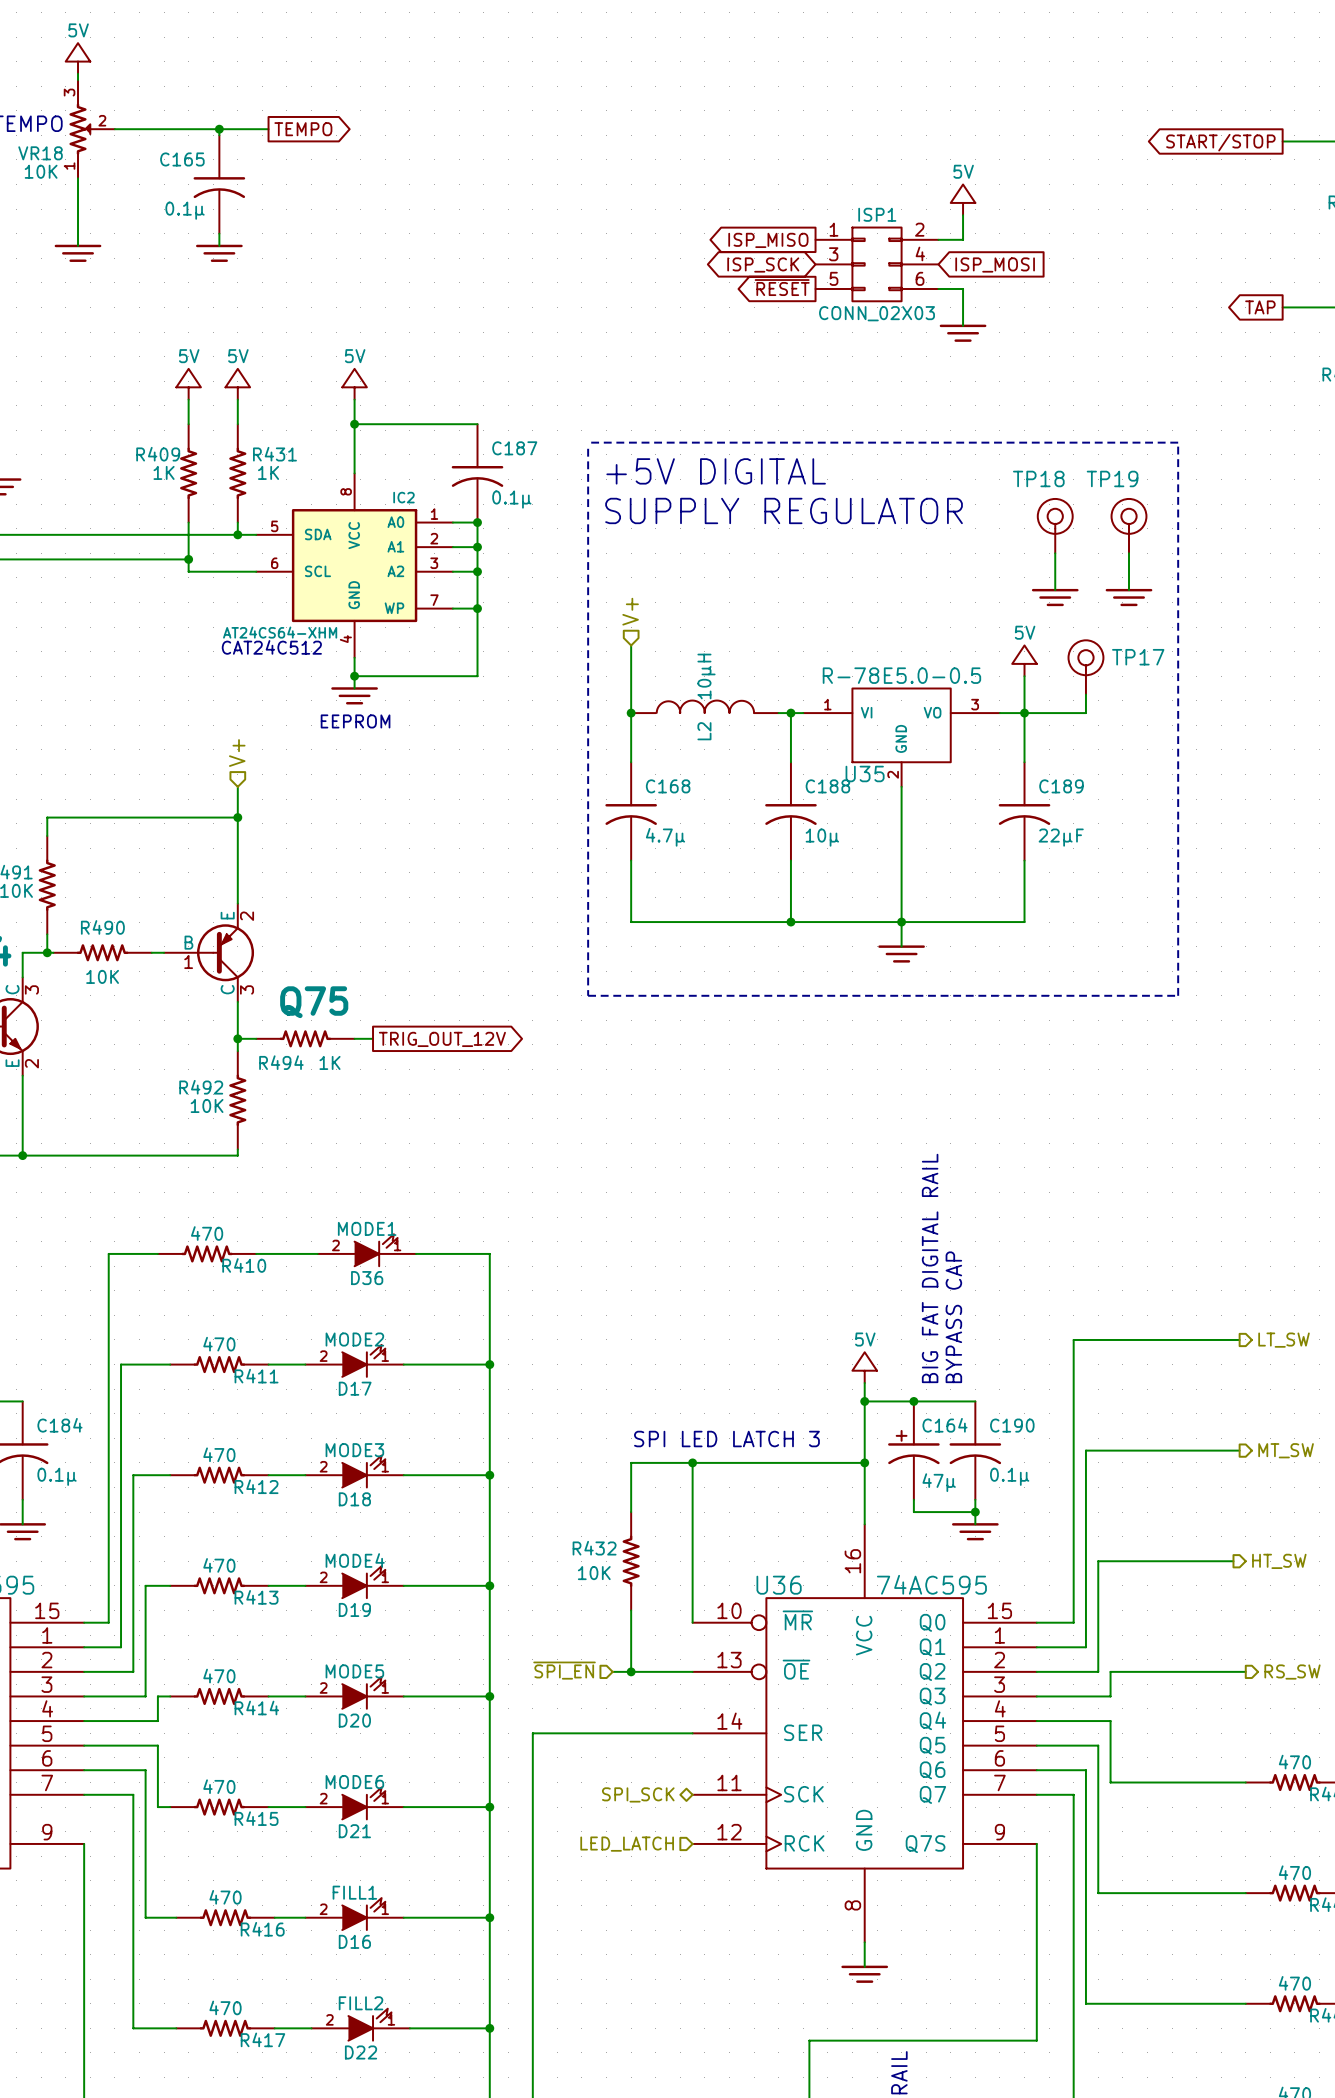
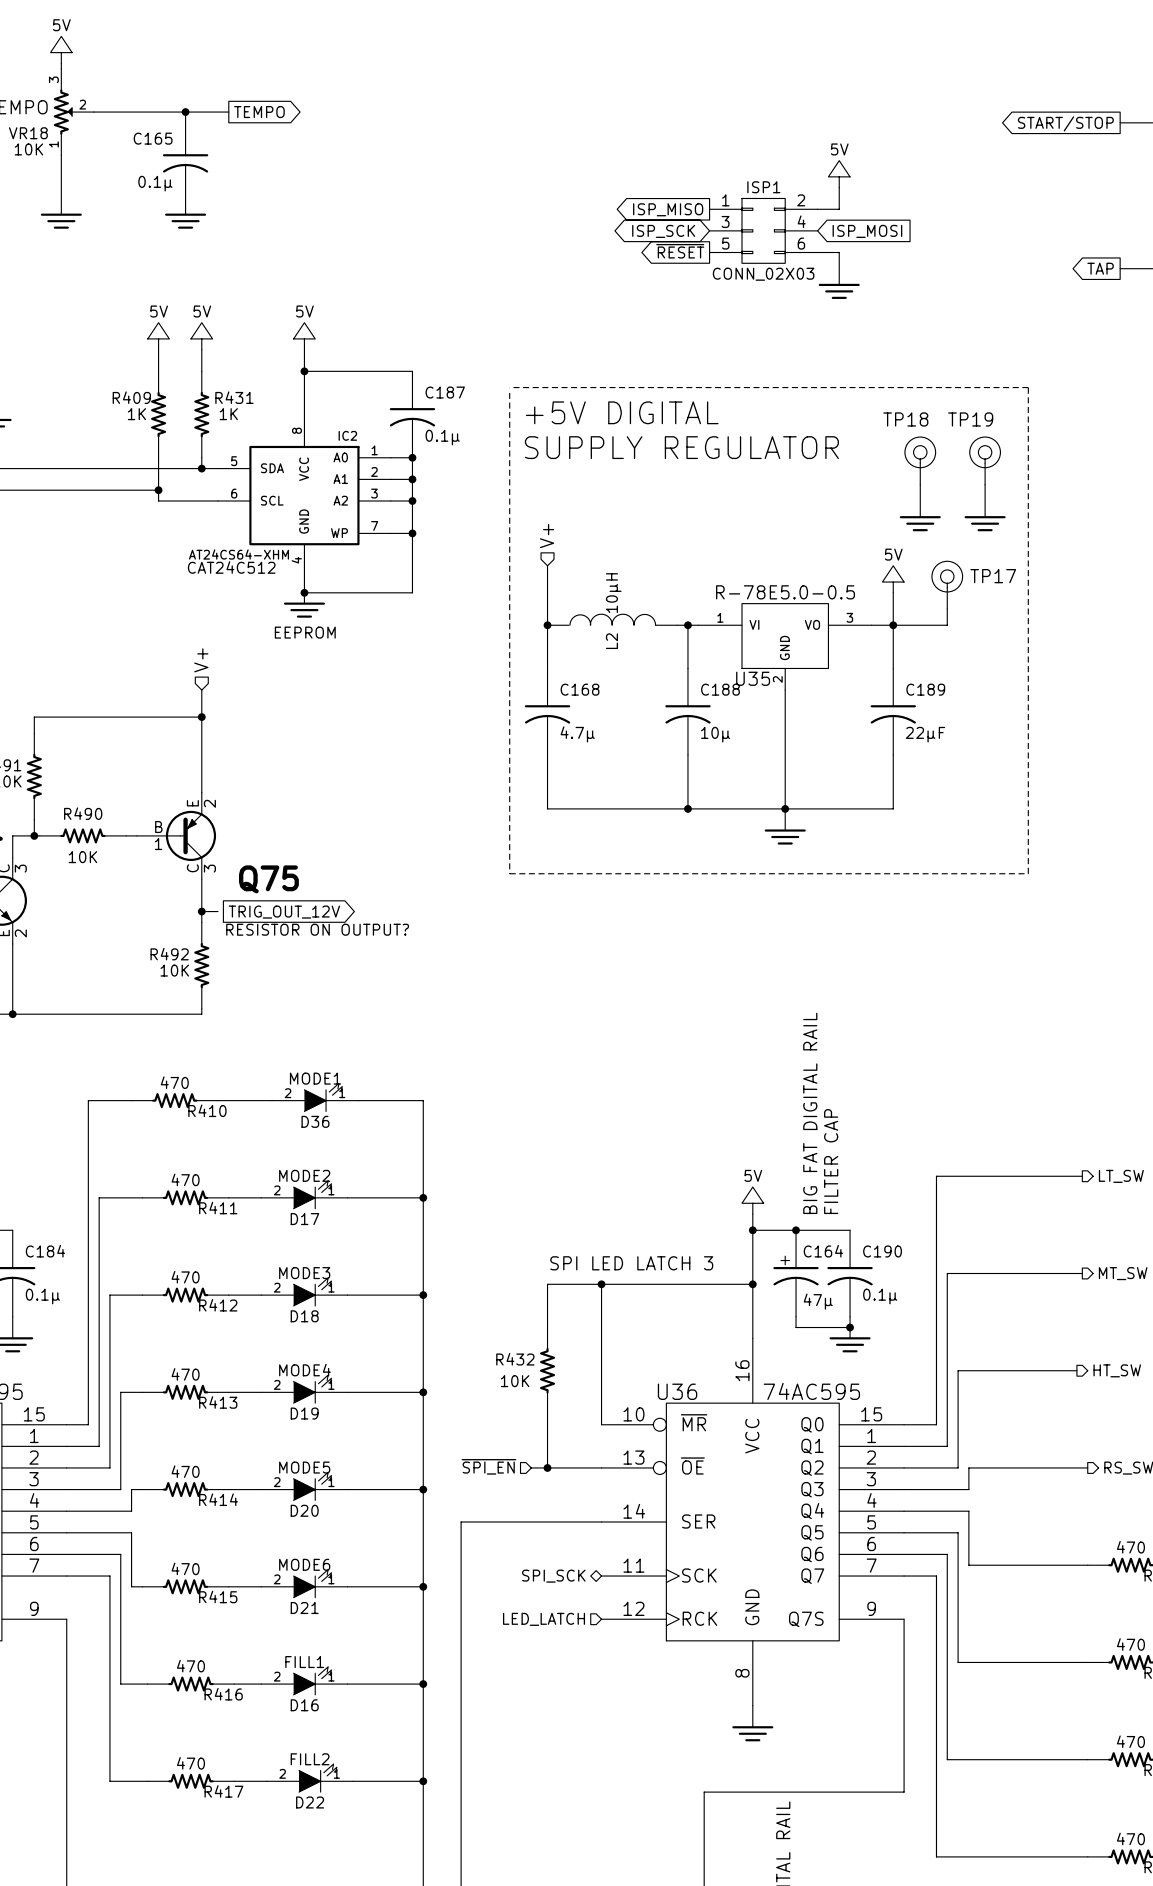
R494: 1K (305, 1038) -> none
wire: (354, 1038) (373, 1038) -> none
global label position: TRIG_OUT_12V (442, 1039) -> TRIG_OUT_12V (284, 912)
text: none -> RESISTOR ON OUTPUT? (317, 929)
text: BYPASS CAP (953, 1317) -> FILTER CAP (831, 1161)

